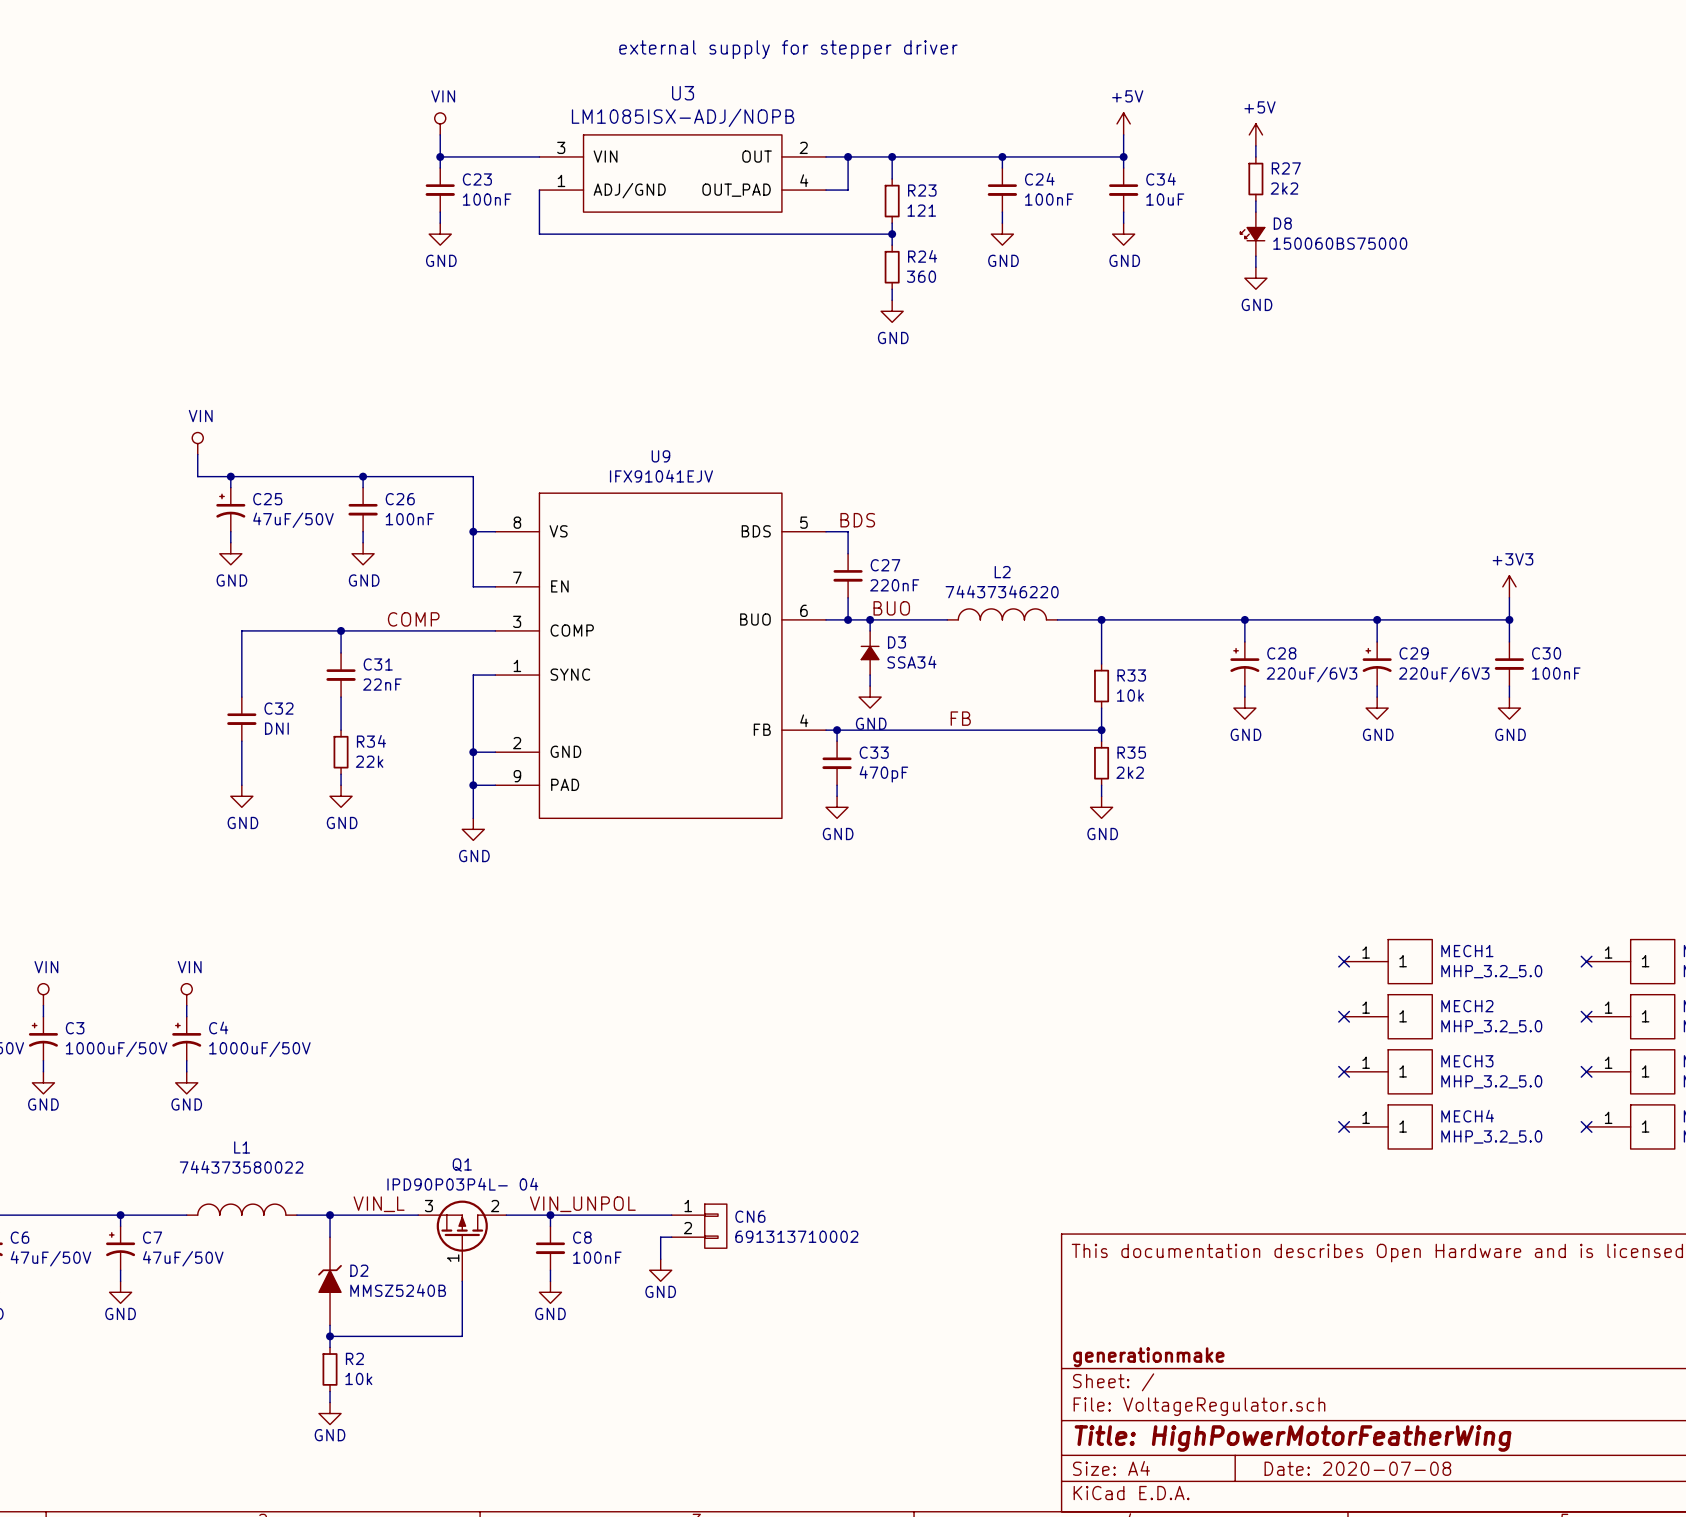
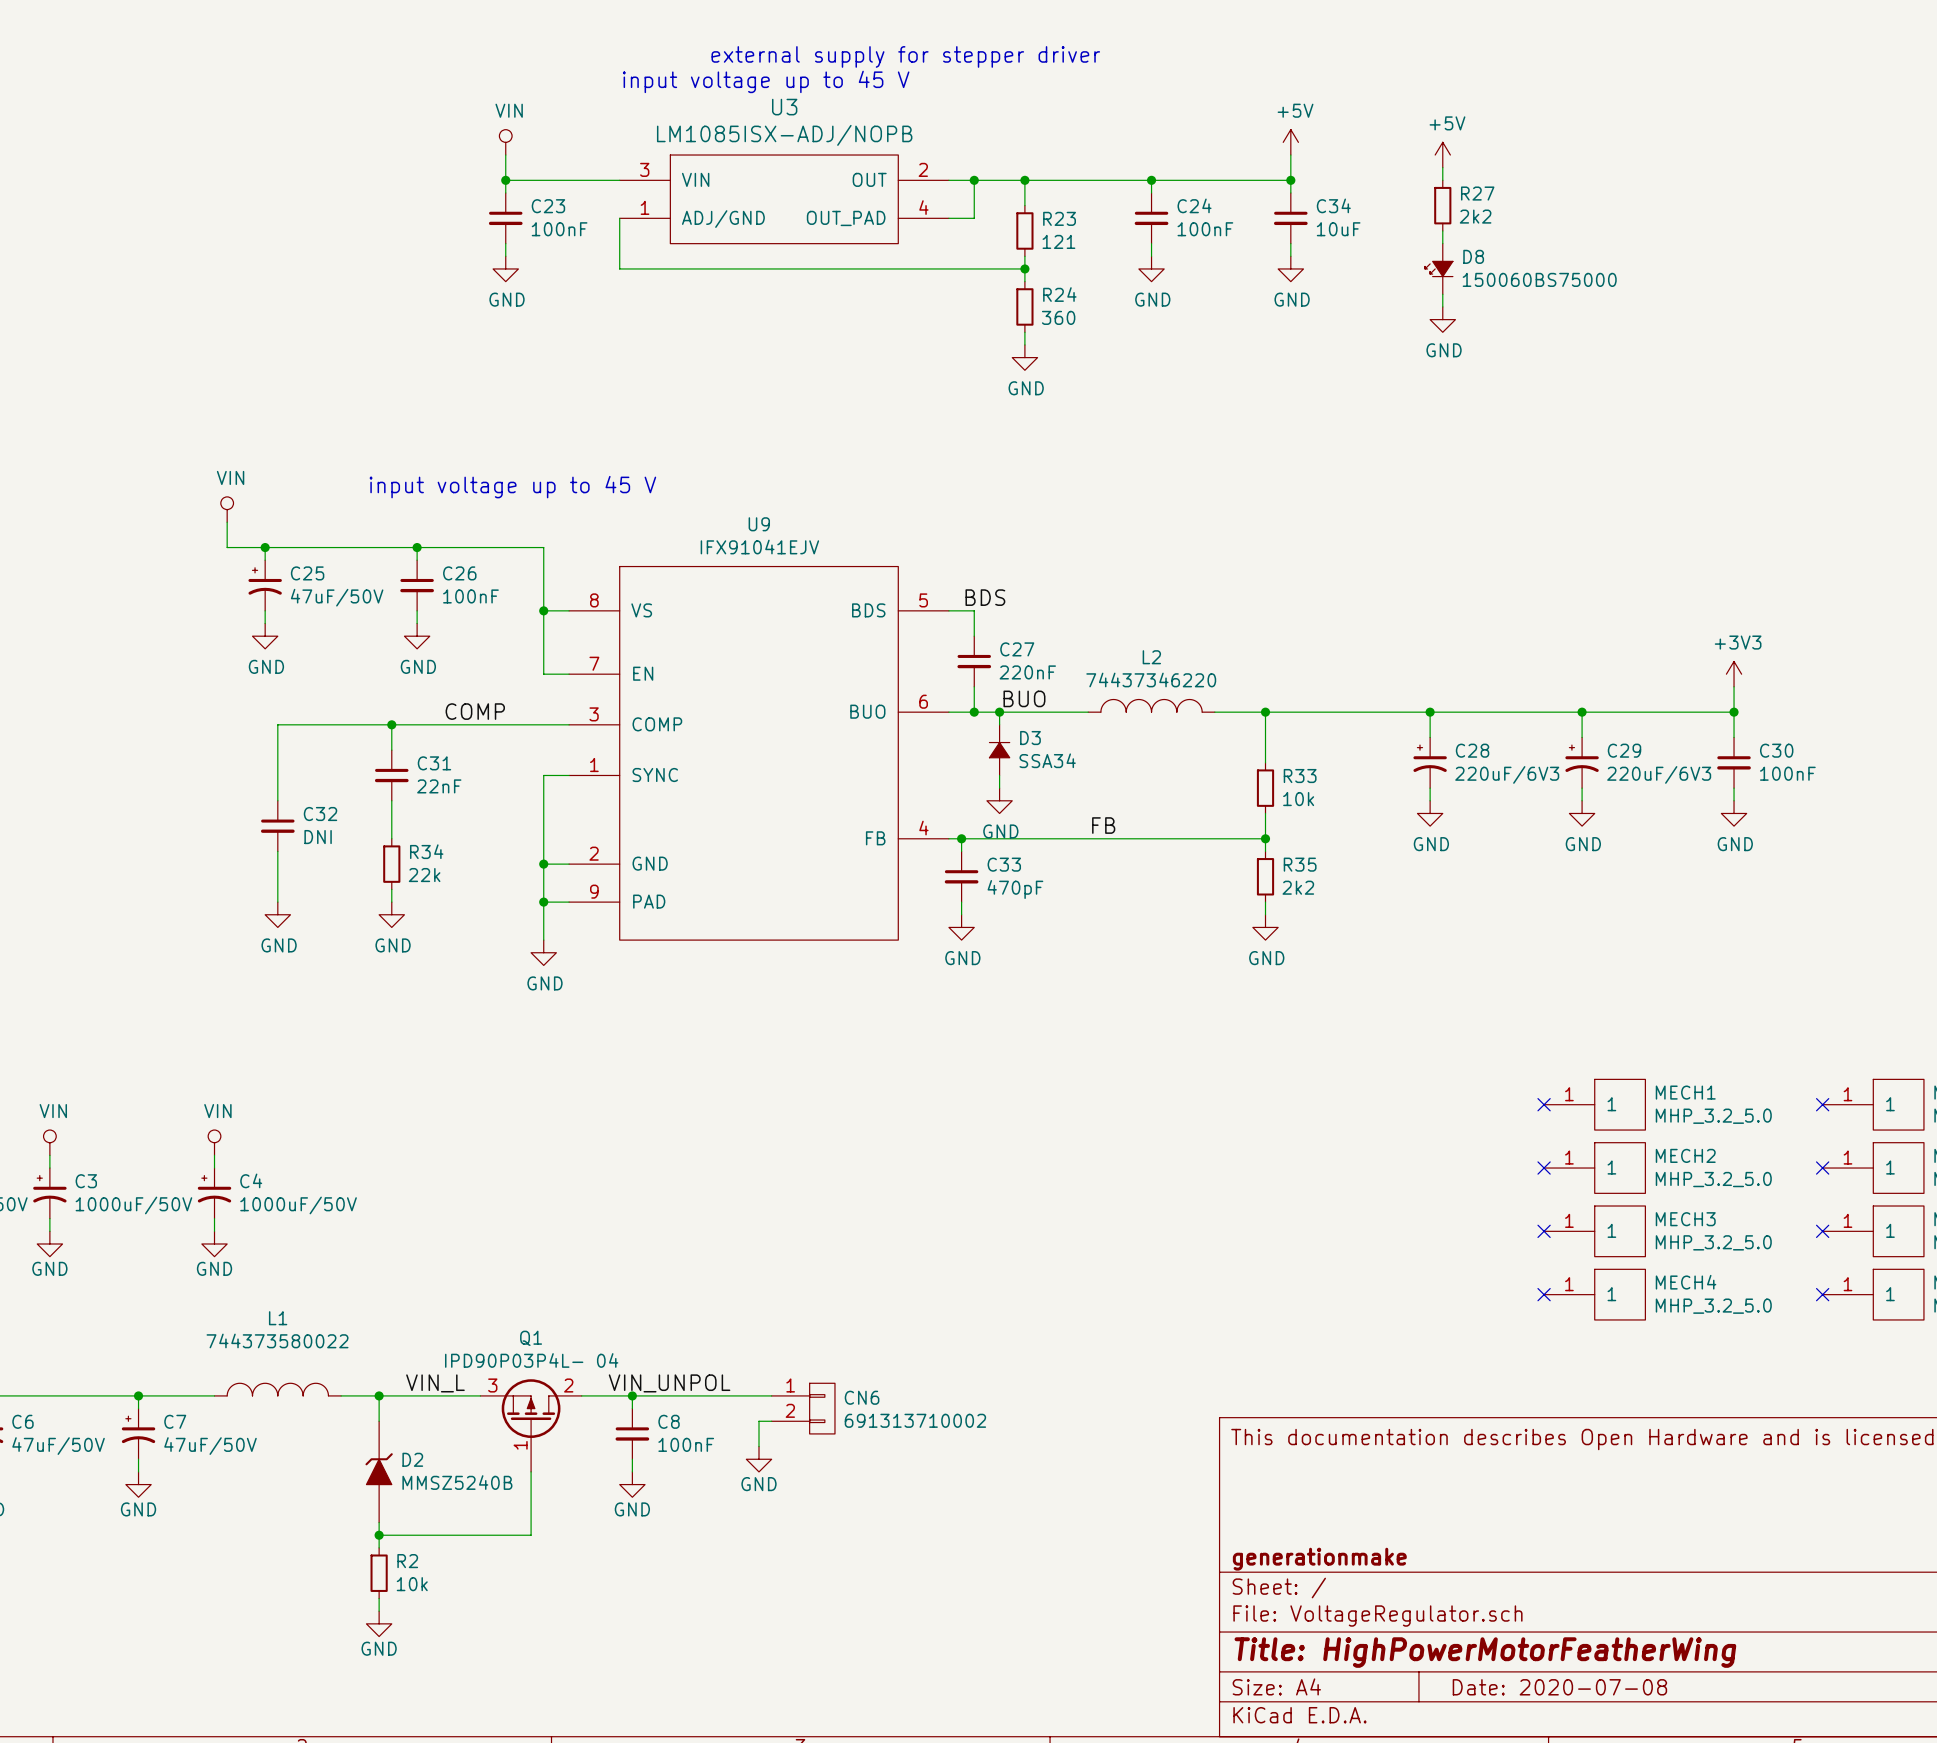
text: none -> input voltage up to 45 V (766, 81)
text: none -> input voltage up to 45 V (512, 487)

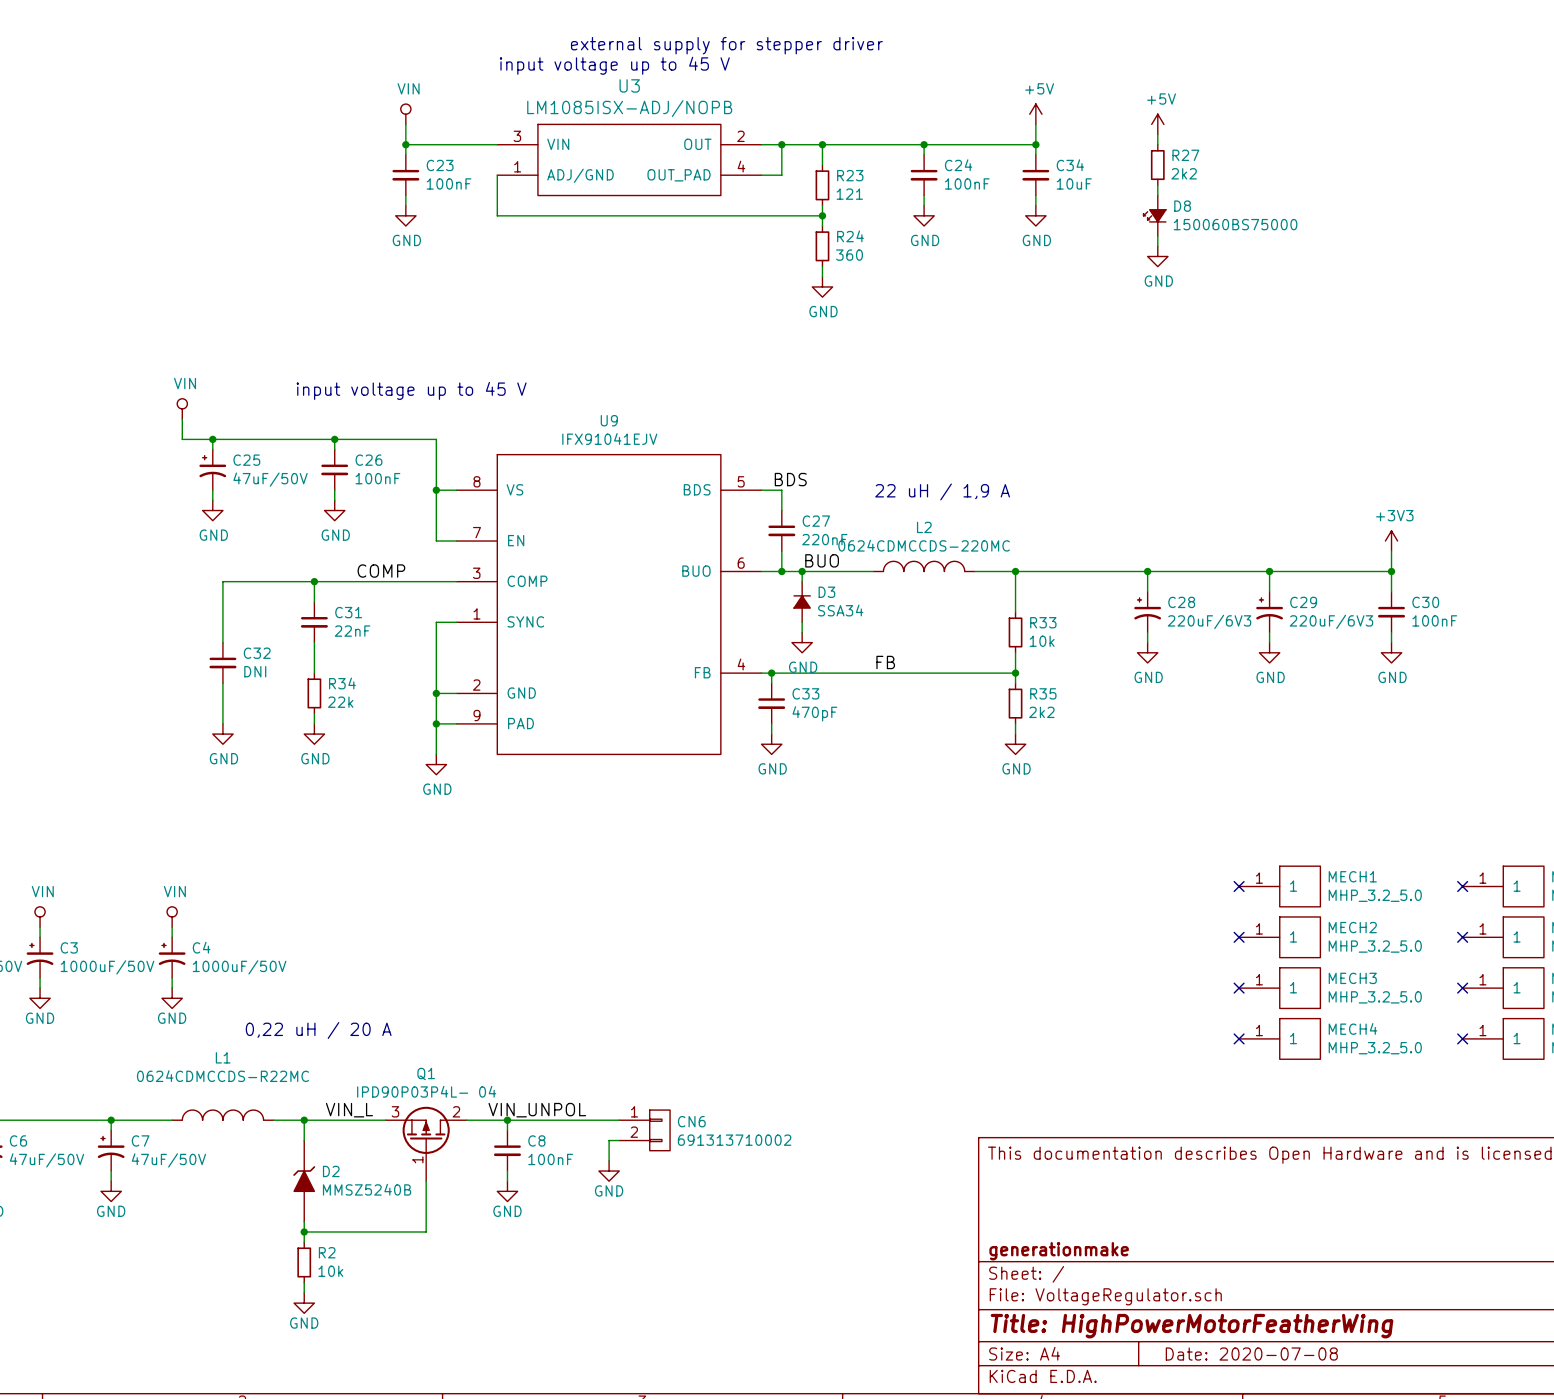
text: none -> 22 uH / 1,9 A (942, 491)
L2 value: 74437346220 (1151, 679) -> 0624CDMCCDS-220MC (924, 545)
text: none -> 0,22 uH / 20 A (318, 1030)
L1 value: 744373580022 (277, 1340) -> 0624CDMCCDS-R22MC (222, 1076)

